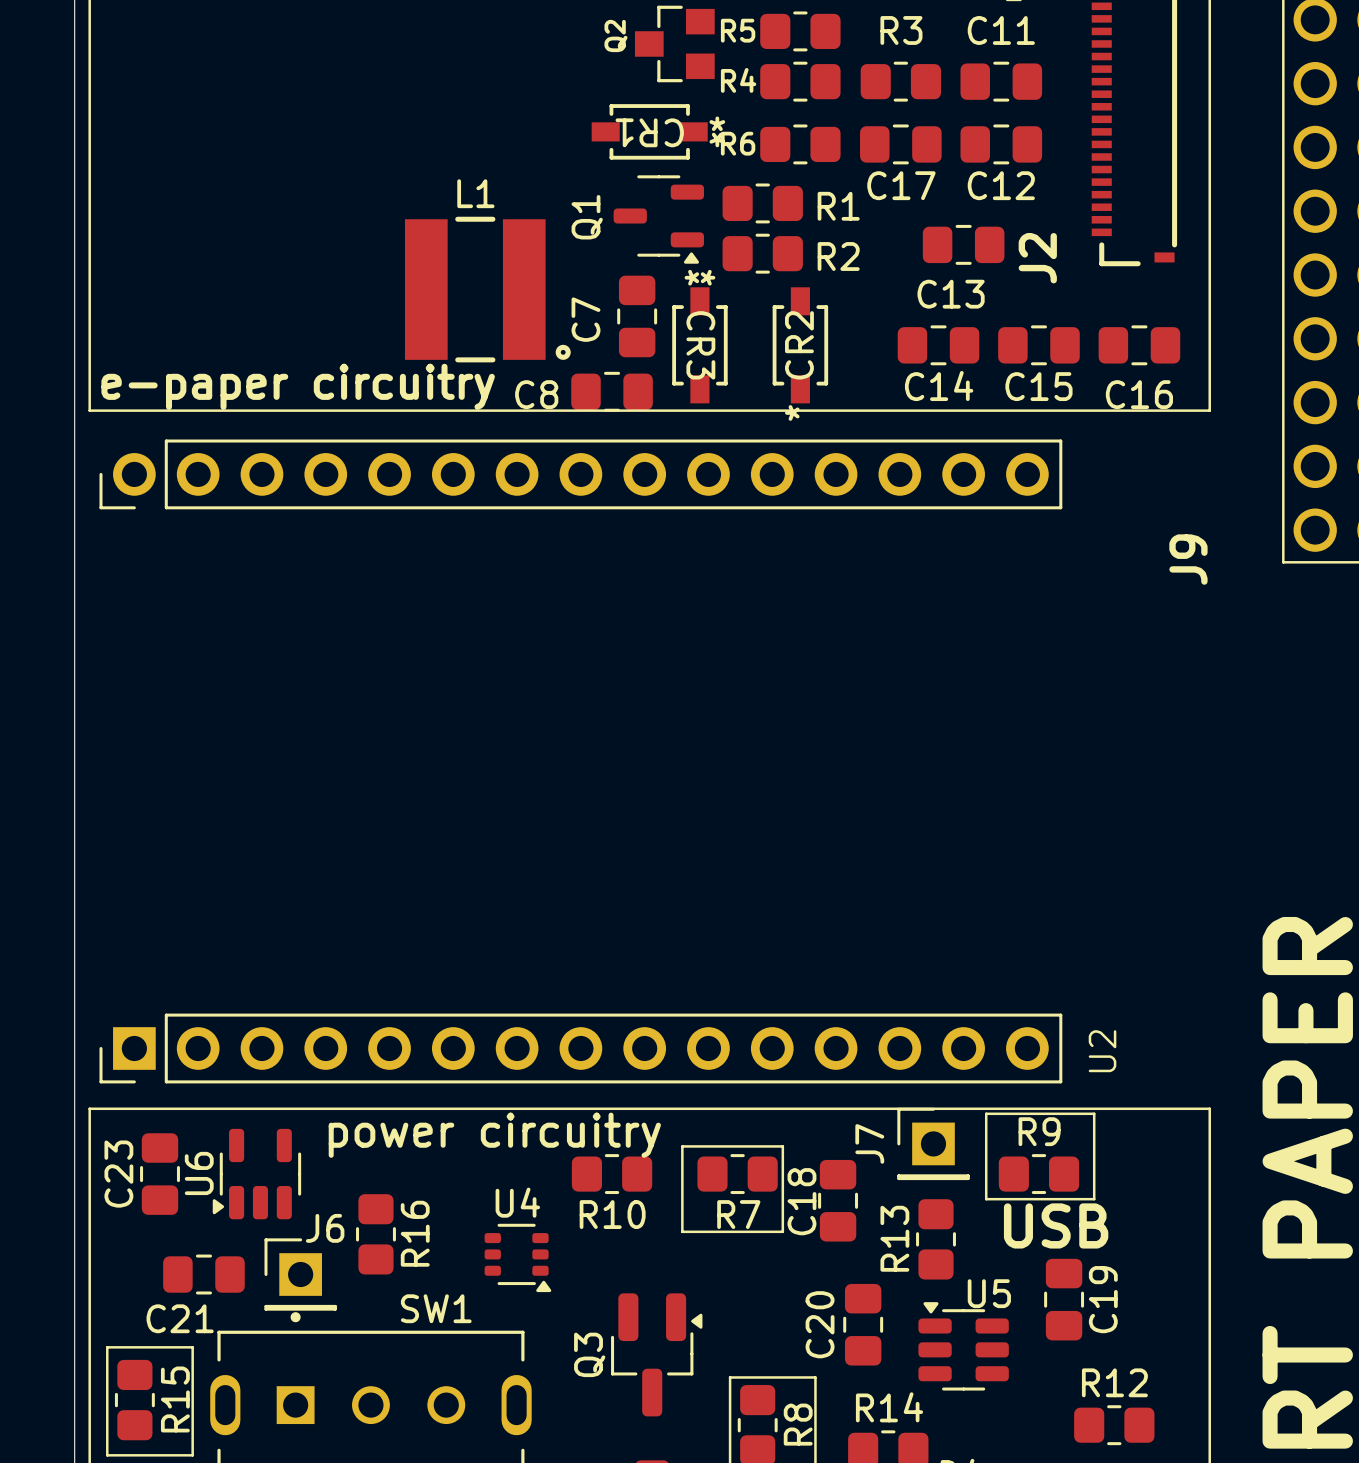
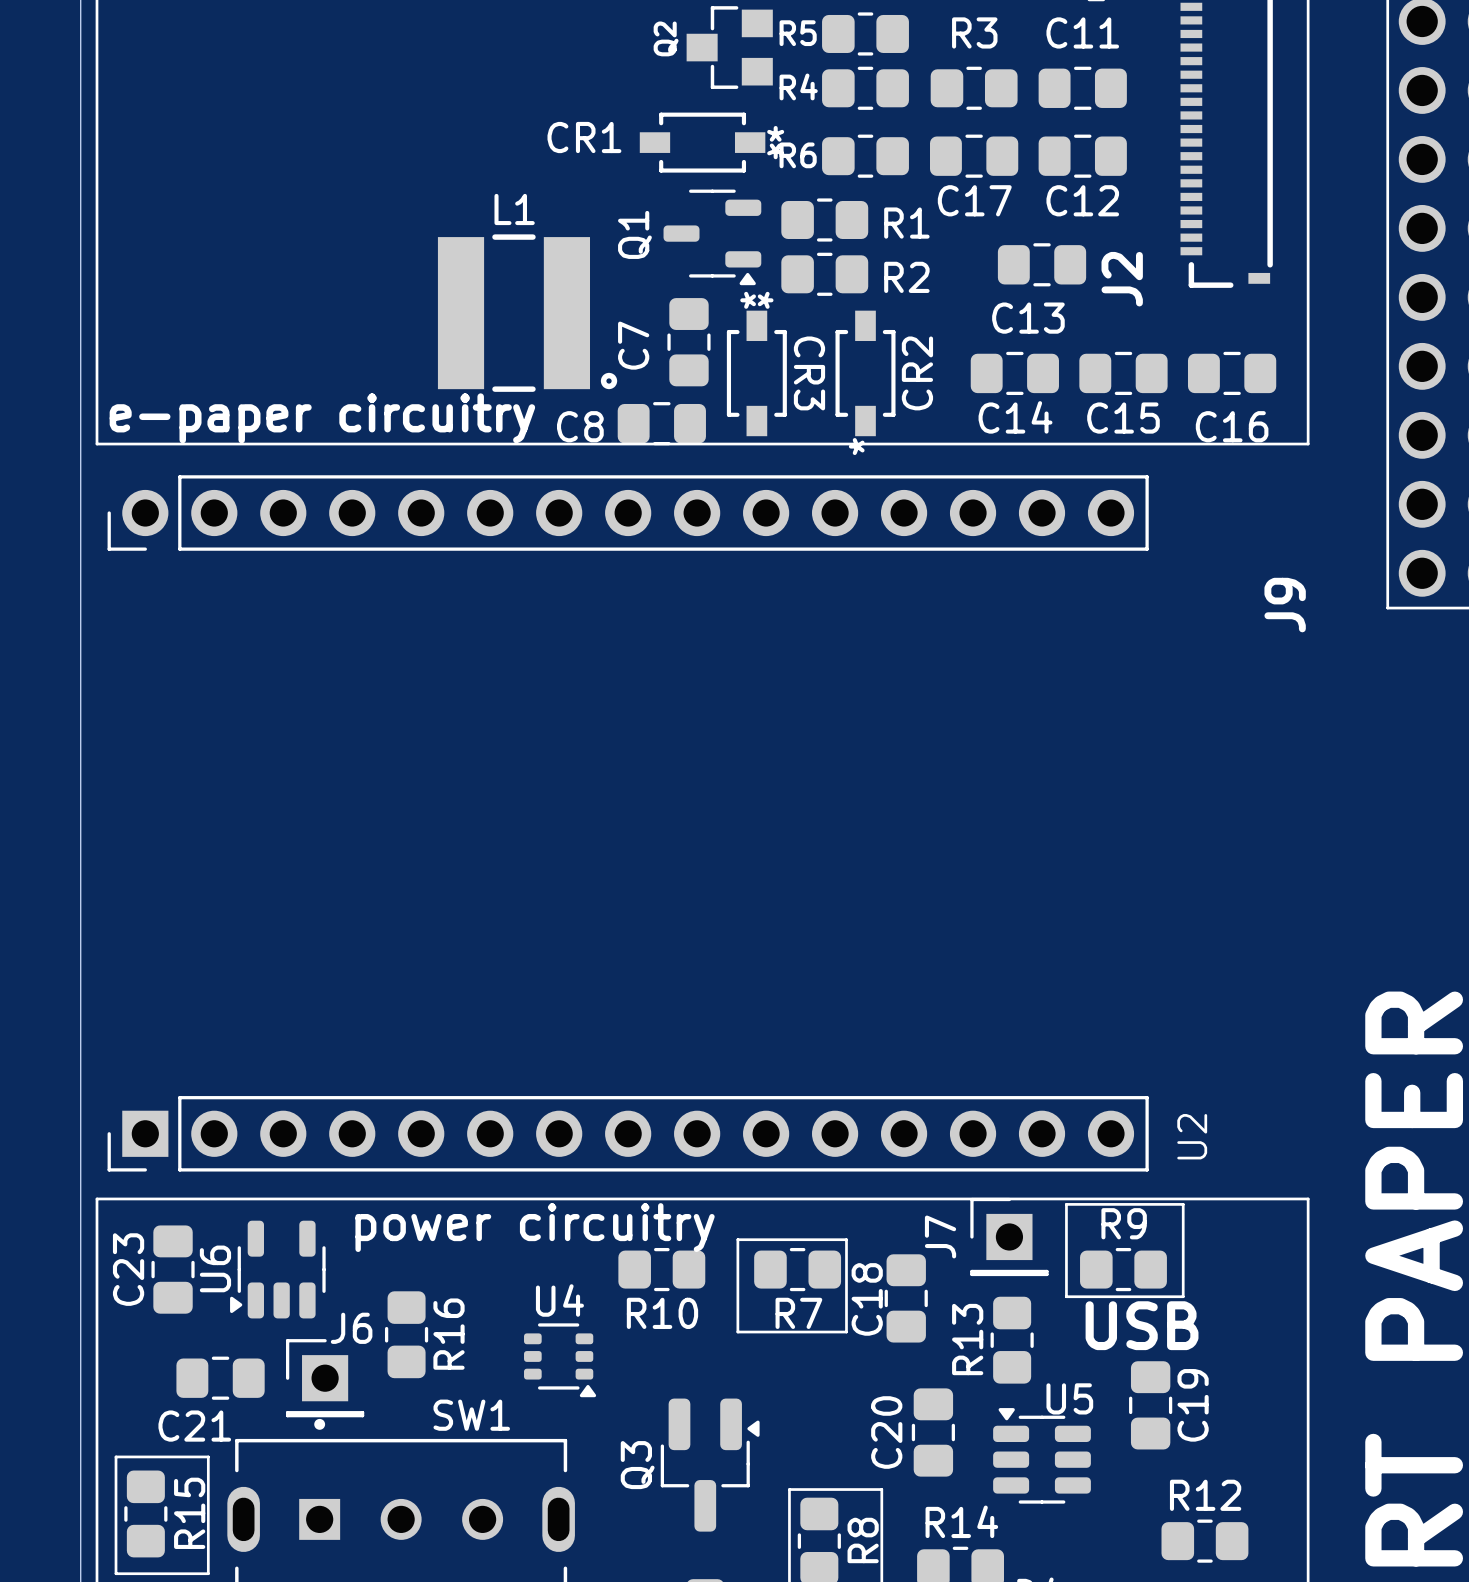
CR1 name rotation: 0° (649, 132) -> 180° (584, 137)
CR1 name position: CR1 (649, 132) -> CR1 (584, 137)
CR3 name position: CR3 (700, 345) -> CR3 (809, 373)
CR2 name position: CR2 (799, 345) -> CR2 (917, 373)

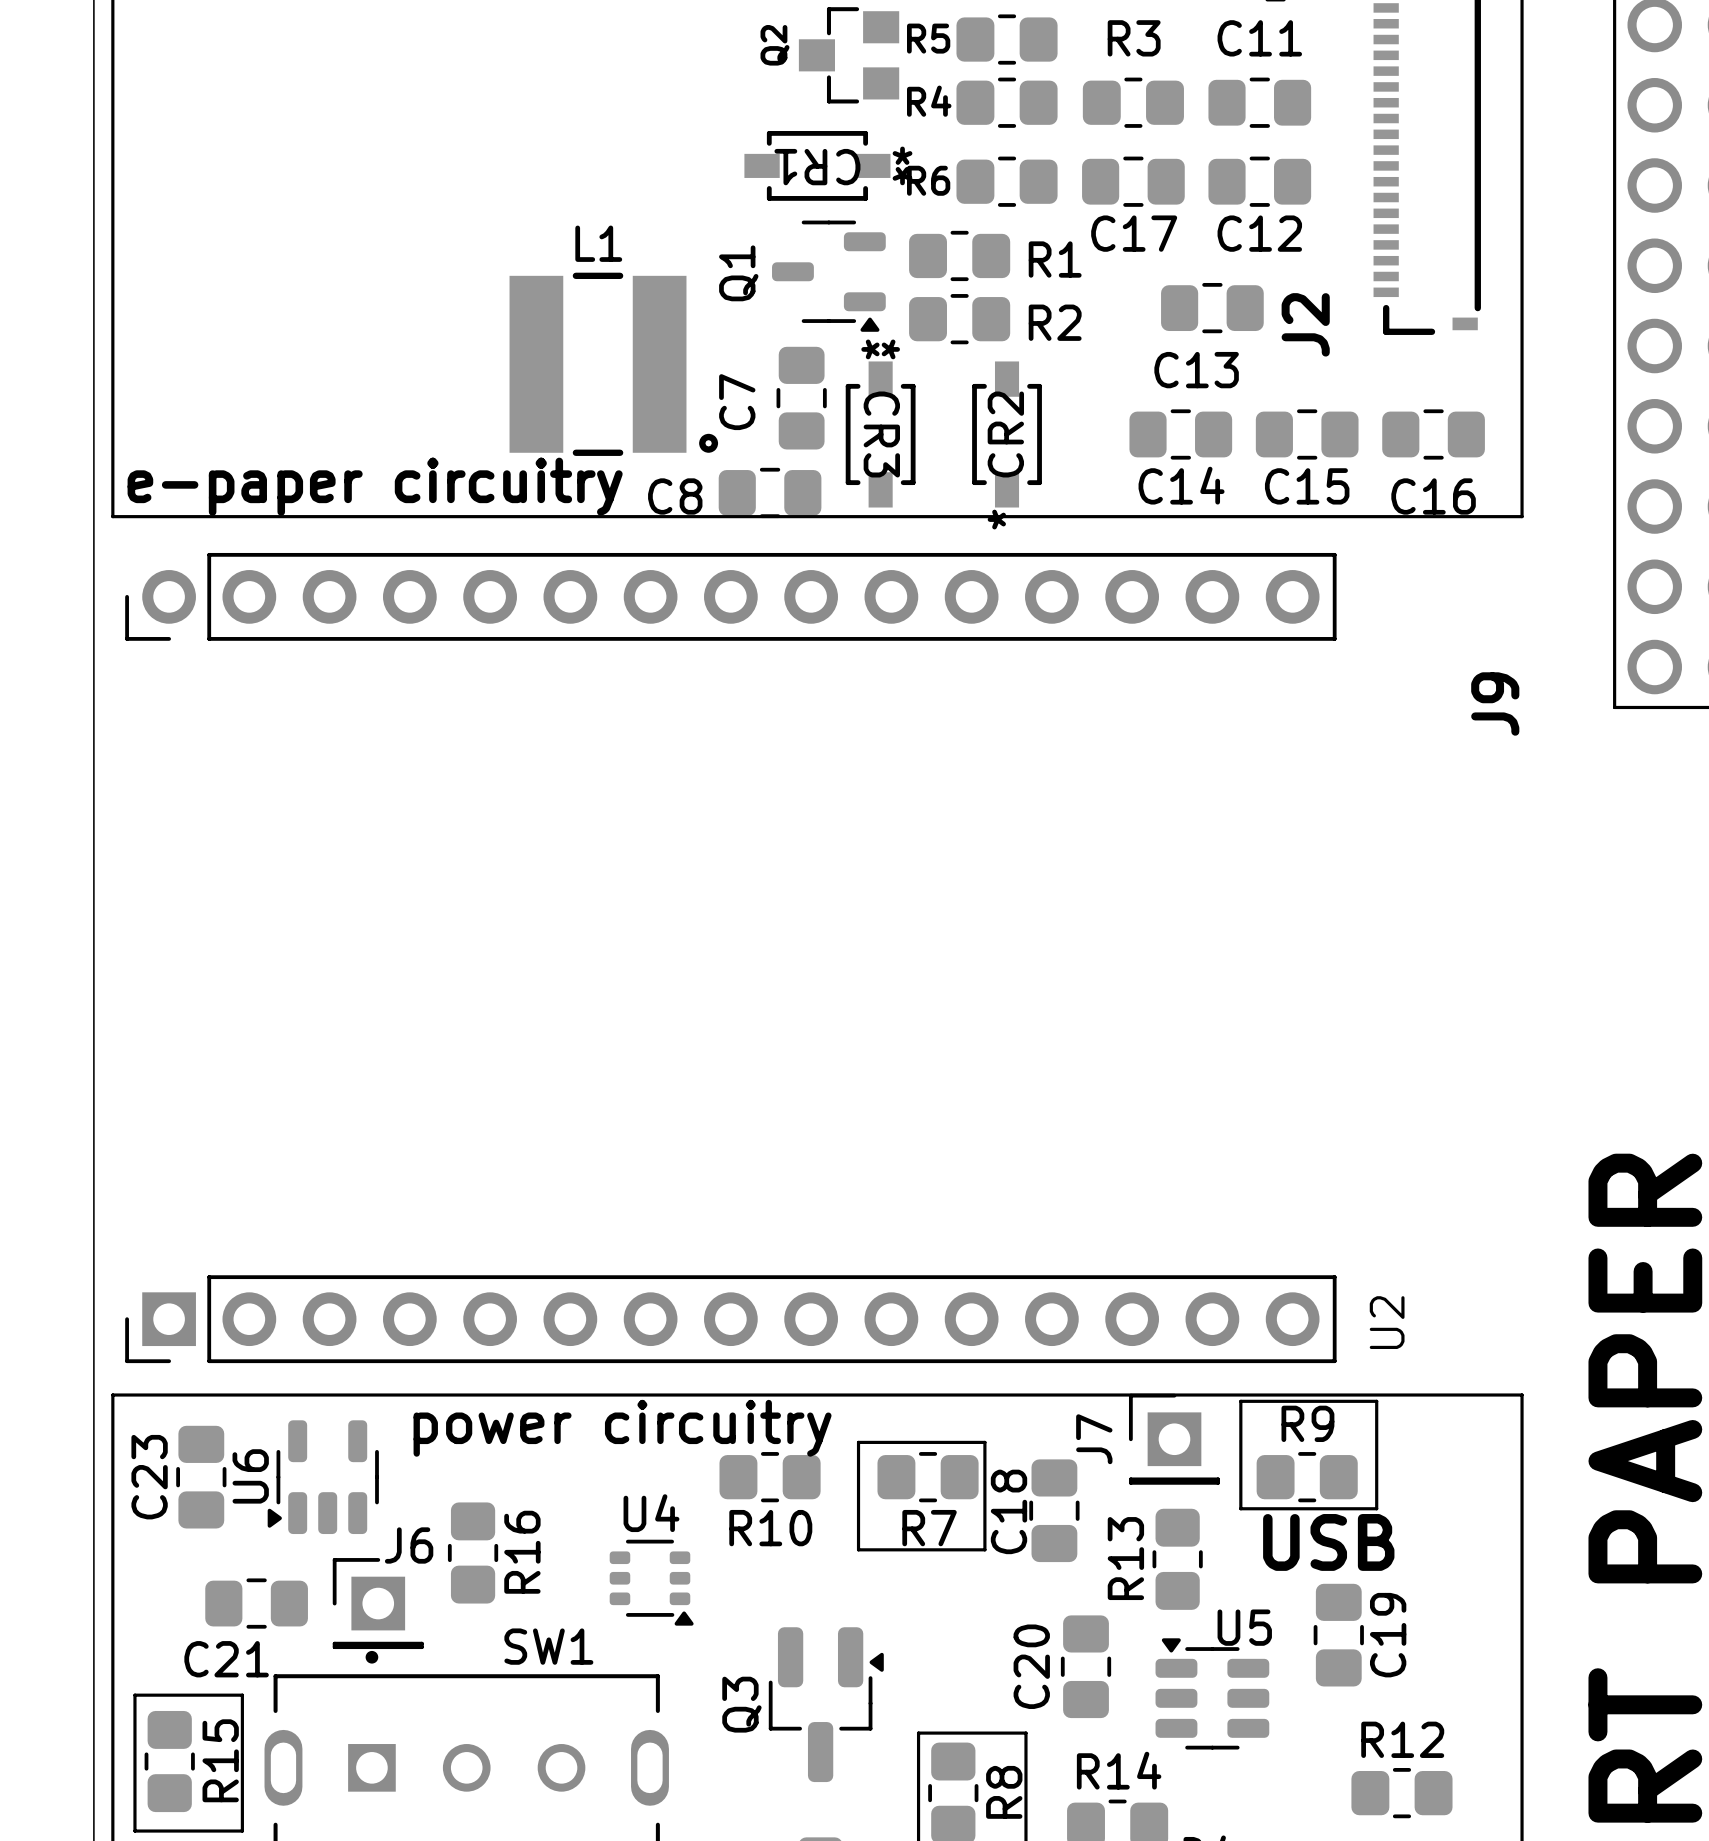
CR1 name rotation: 0° (584, 137) -> 180° (817, 167)
CR1 name position: CR1 (584, 137) -> CR1 (817, 167)
CR3 name position: CR3 (809, 373) -> CR3 (881, 434)
CR2 name position: CR2 (917, 373) -> CR2 (1005, 434)

